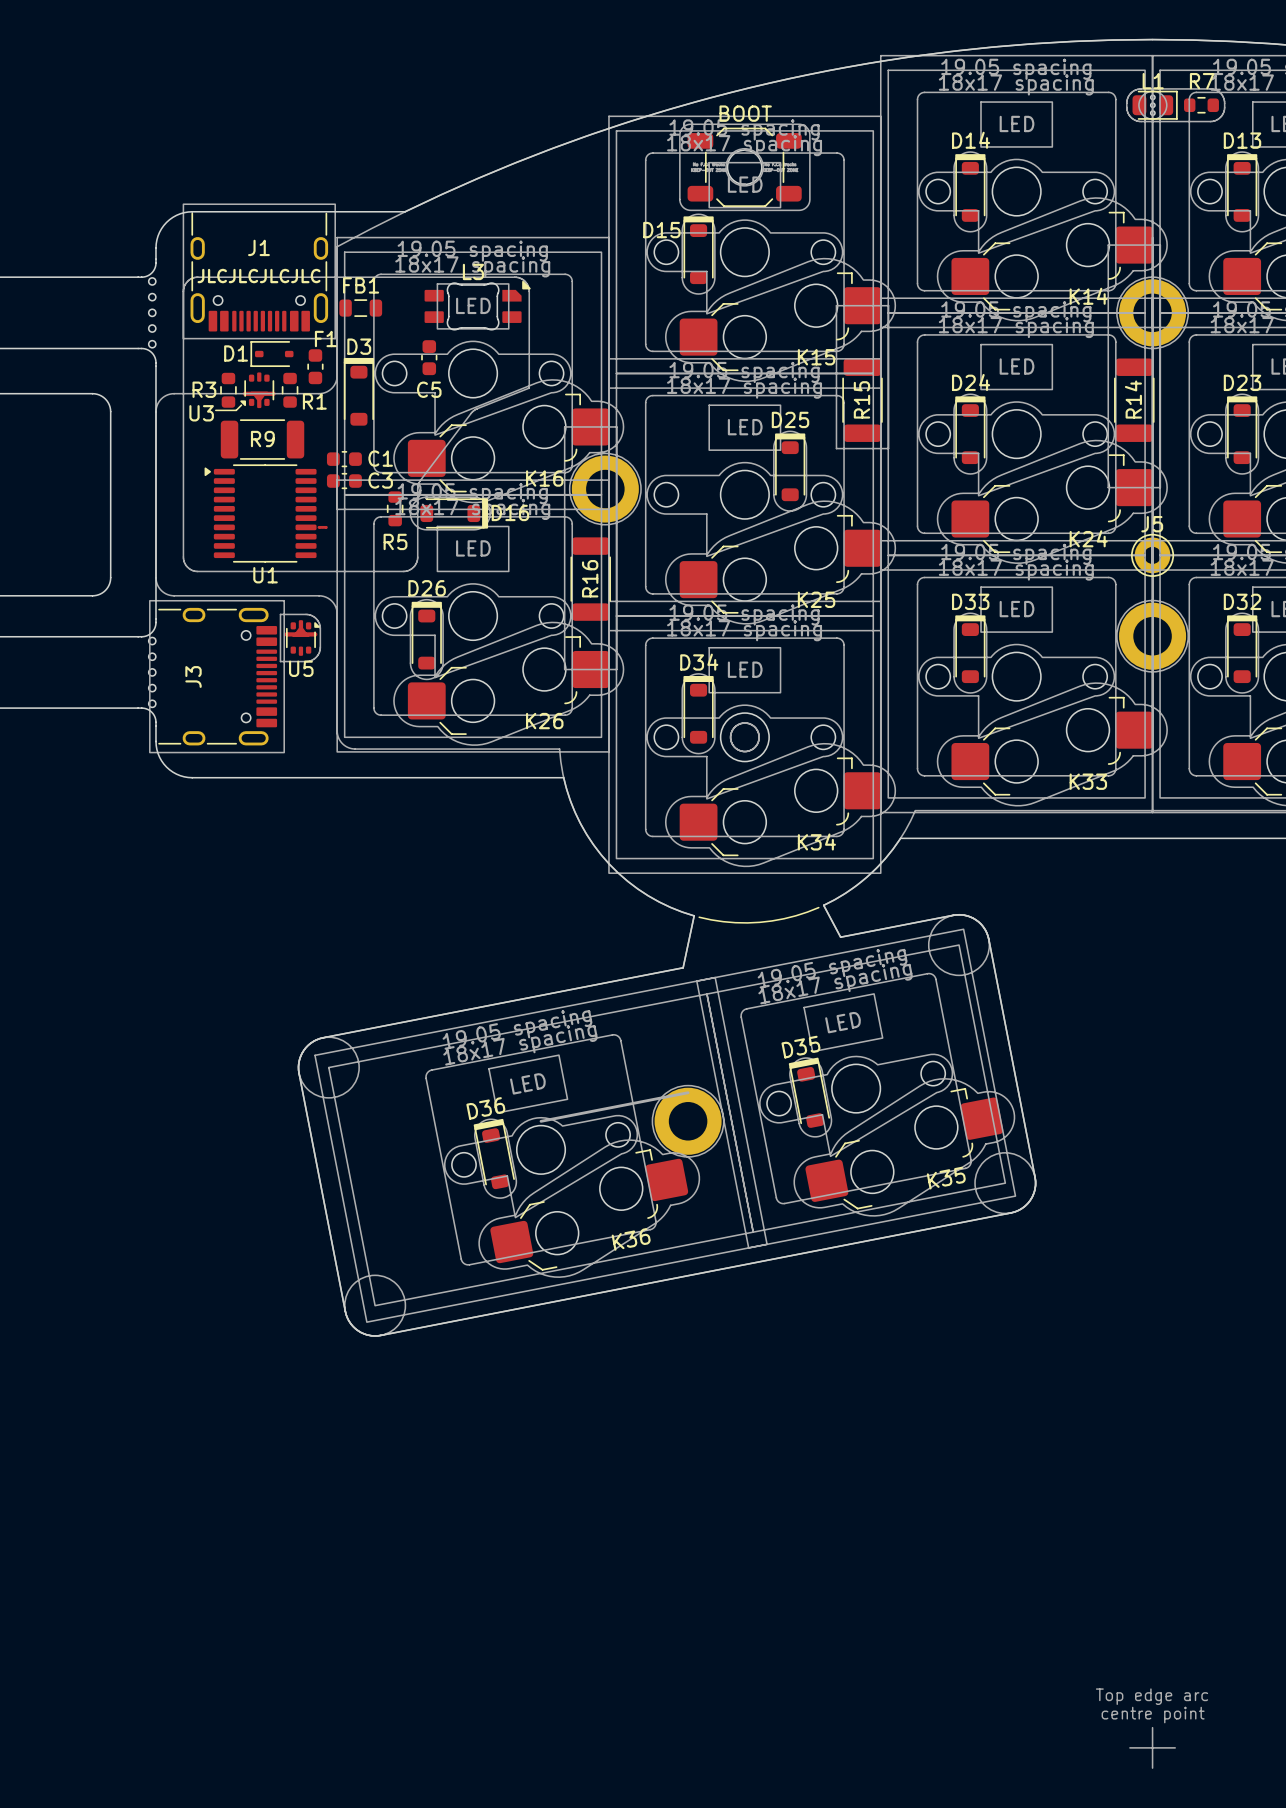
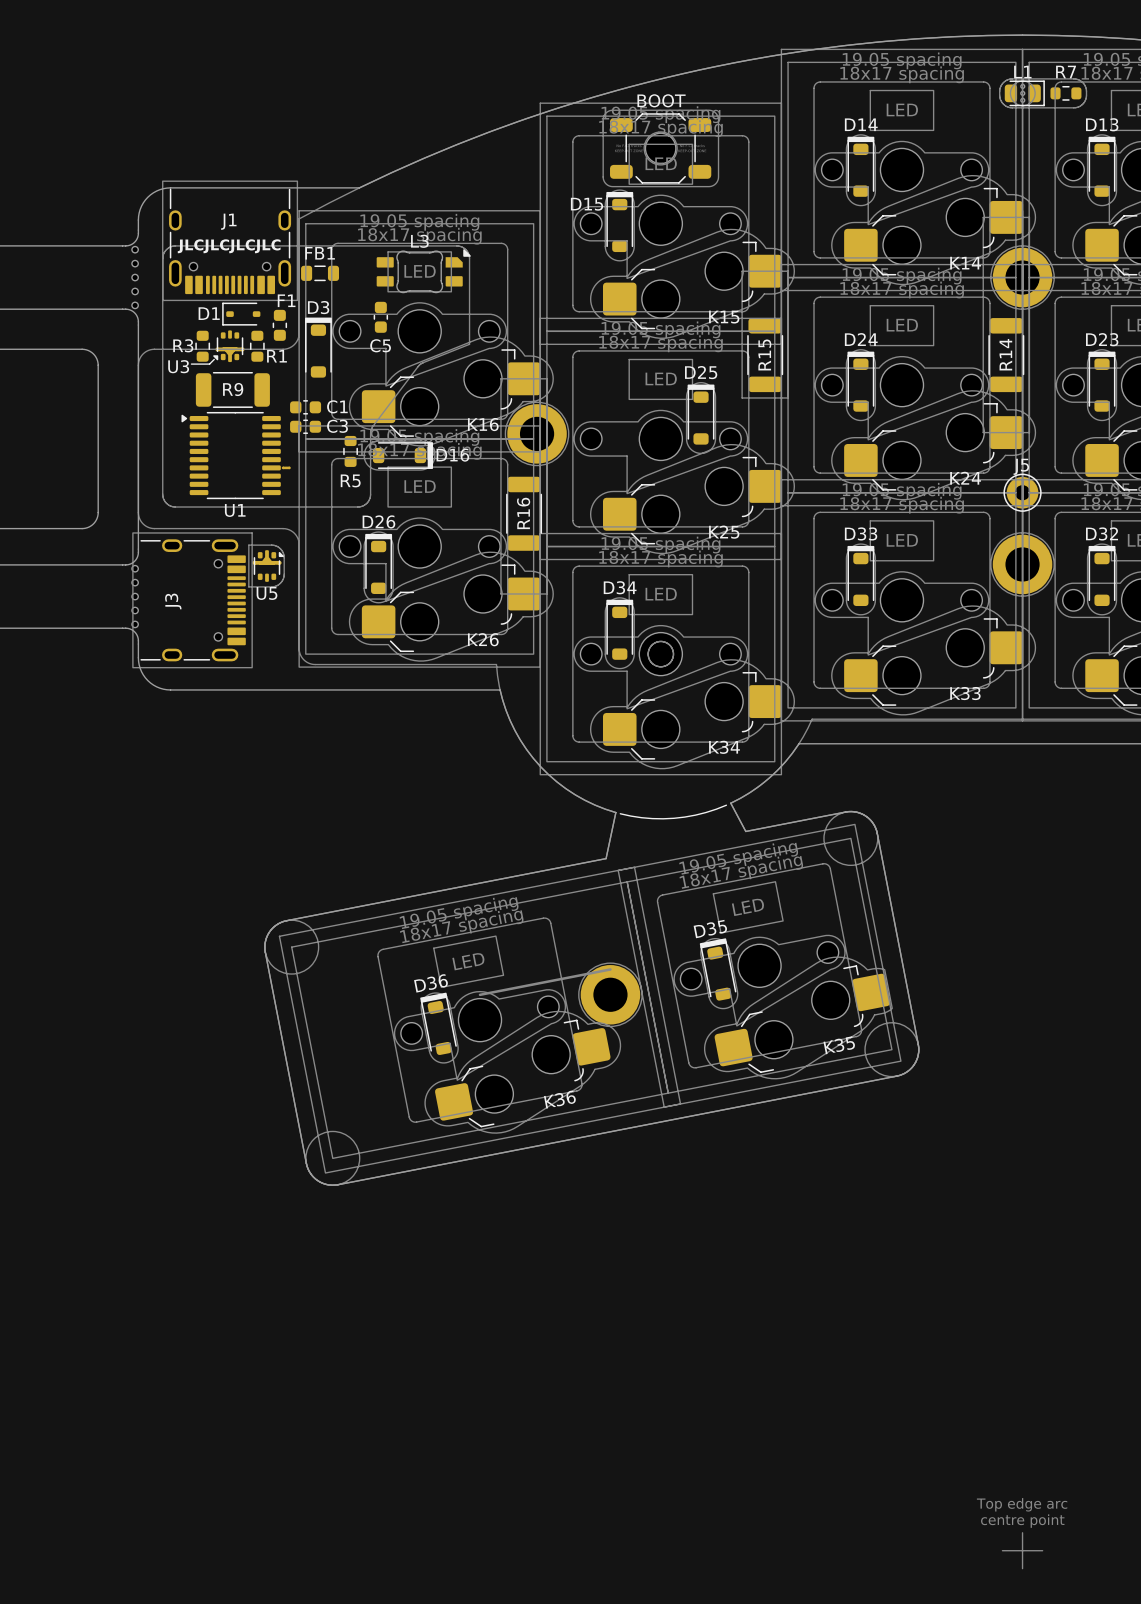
K35 footprint: [696, 928, 1017, 1249] -> [617, 823, 902, 1108]

